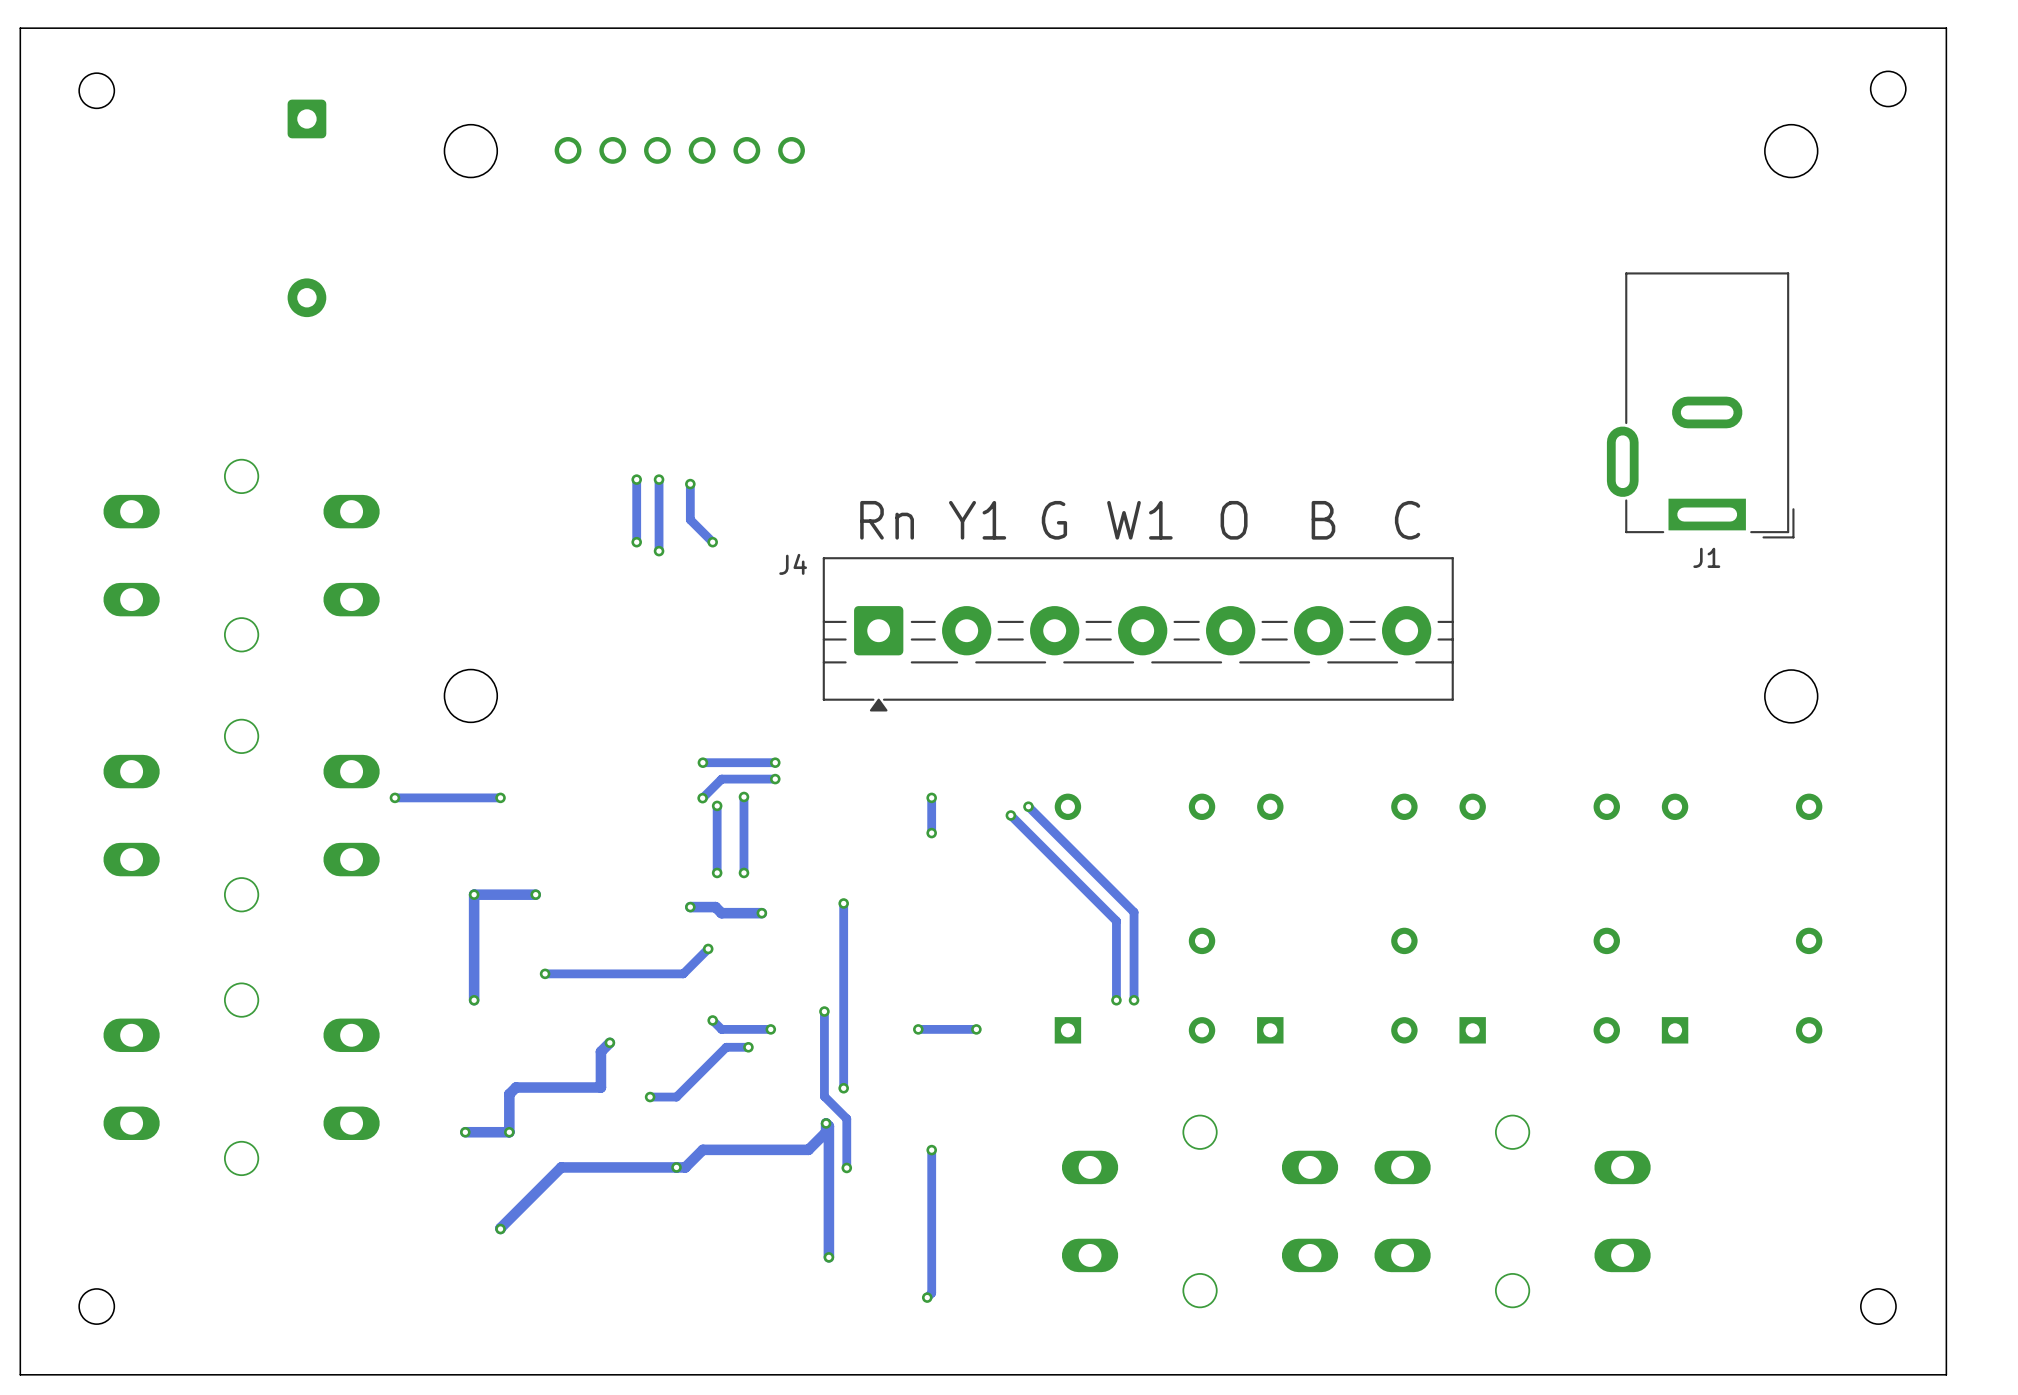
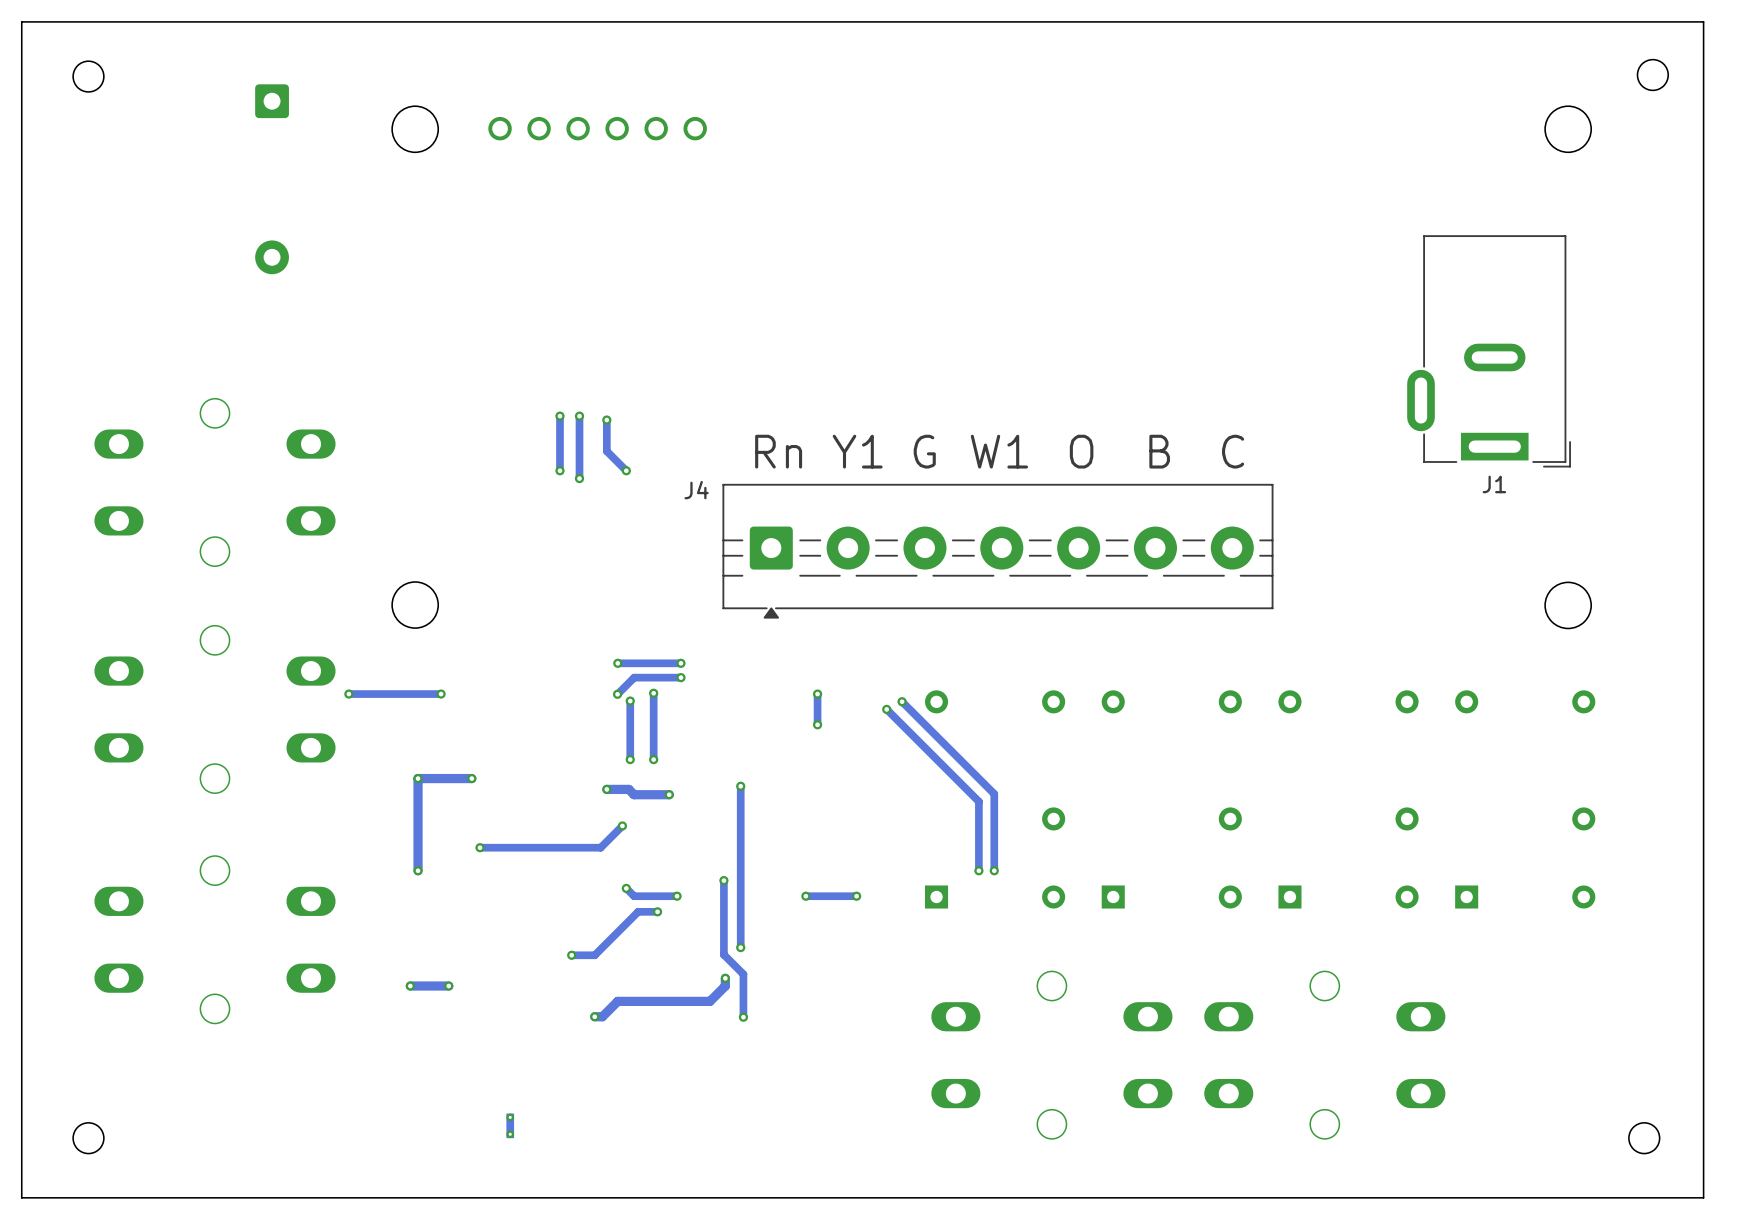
track: (609, 1042) (600, 1051) (600, 1087) (516, 1087) (509, 1094) (509, 1132) -> none
via: (609, 1042) -> none
track: (826, 1123) (828, 1126) (828, 1257) -> none
track: (931, 1150) (931, 1293) (927, 1297) -> none
via: (931, 1150) -> none
track: (676, 1167) (561, 1167) (500, 1229) -> none
via: (500, 1229) -> none
via: (828, 1257) -> none
part: none -> (510, 1125)
via: (927, 1297) -> none

